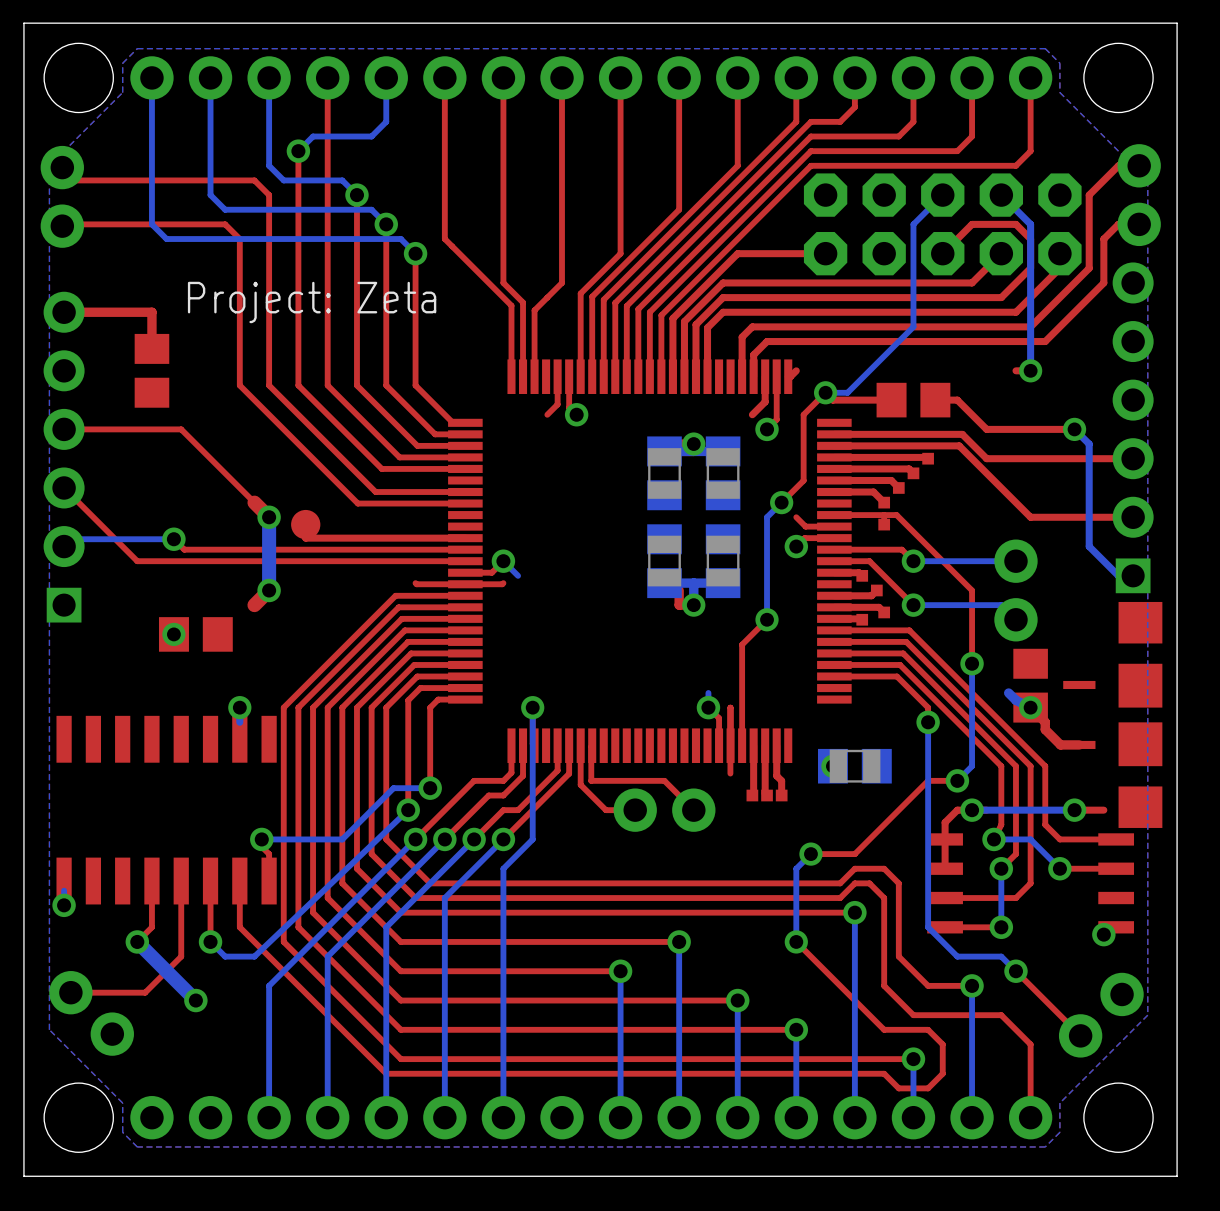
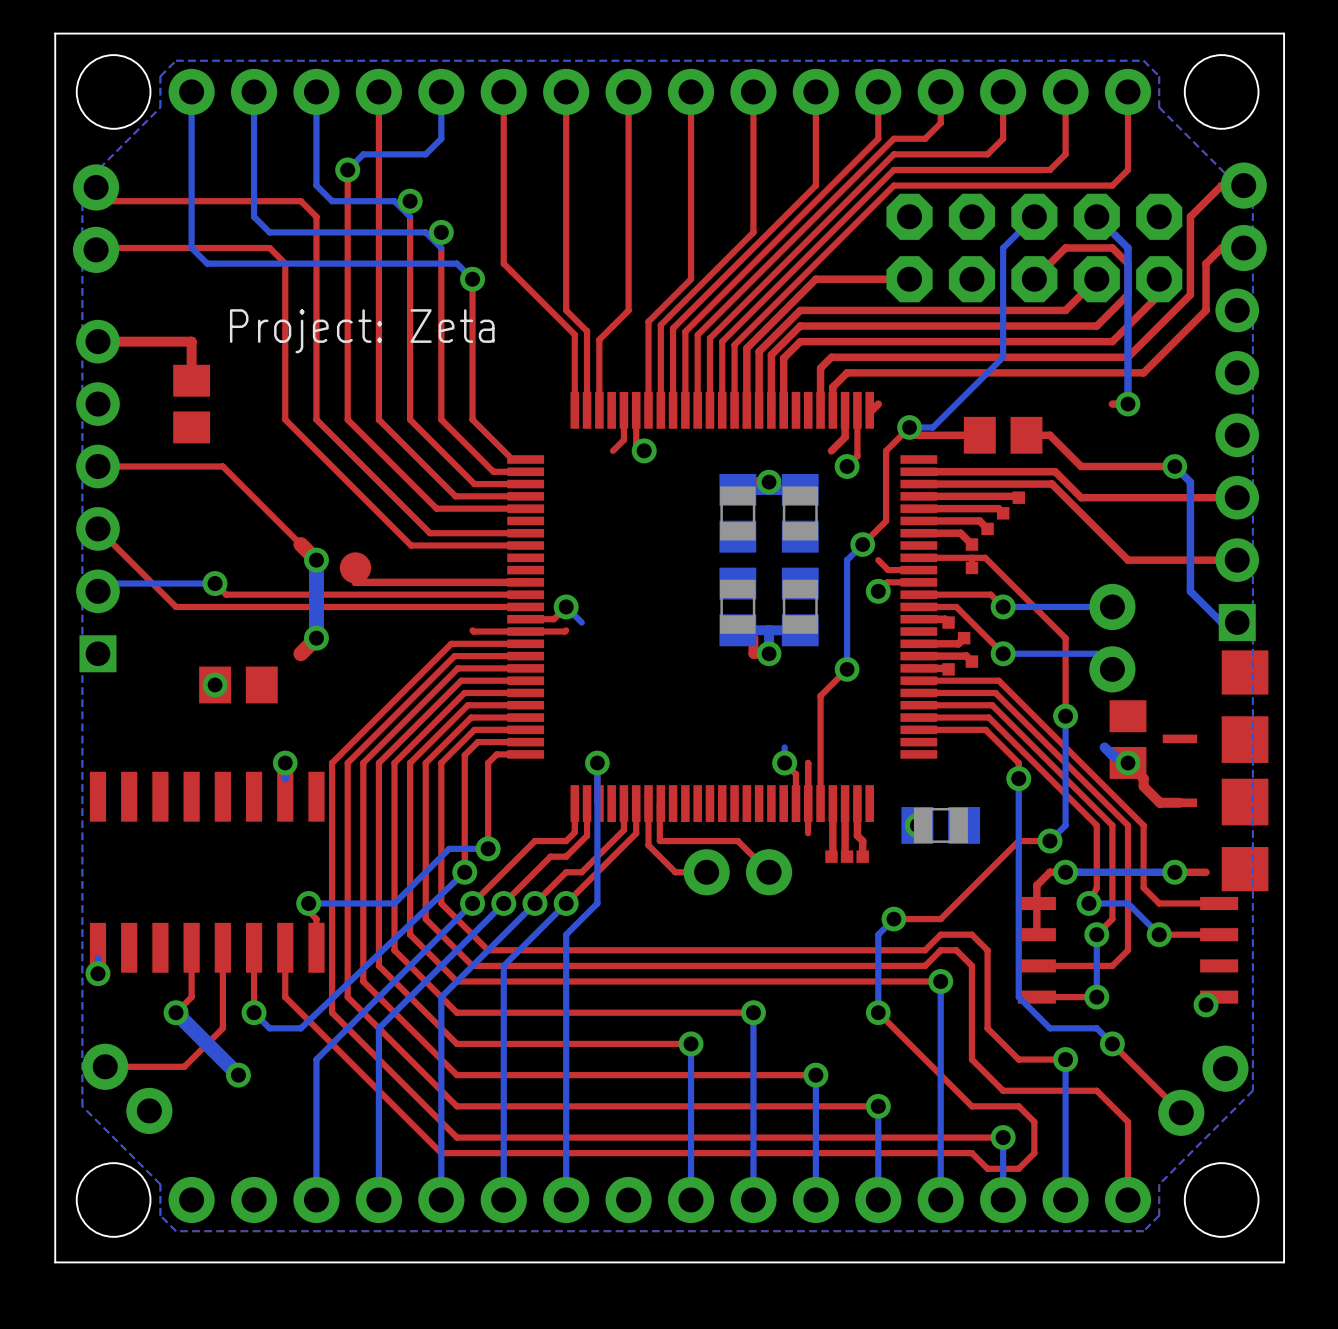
via position: (356, 195) -> (410, 201)
via position: (386, 224) -> (441, 232)

